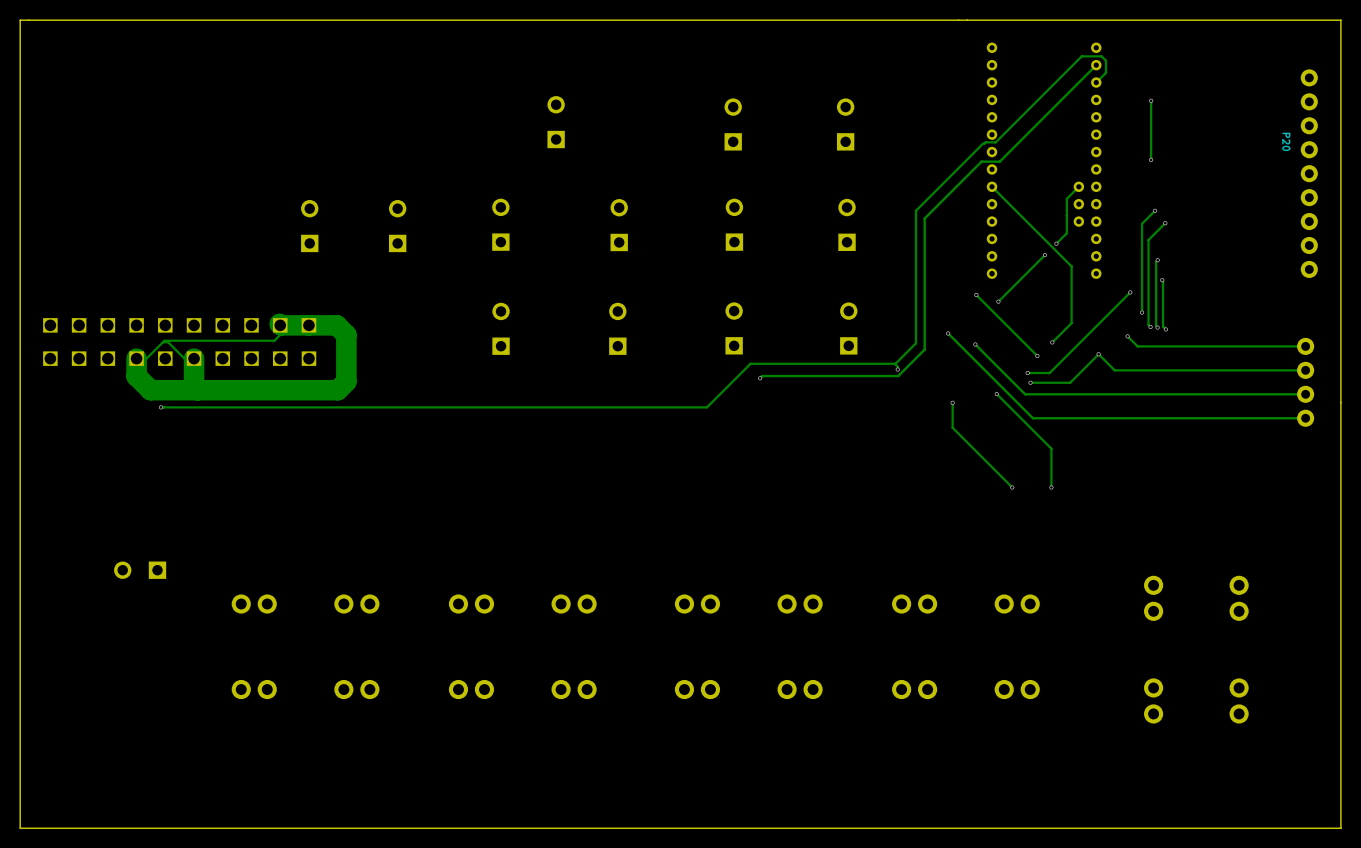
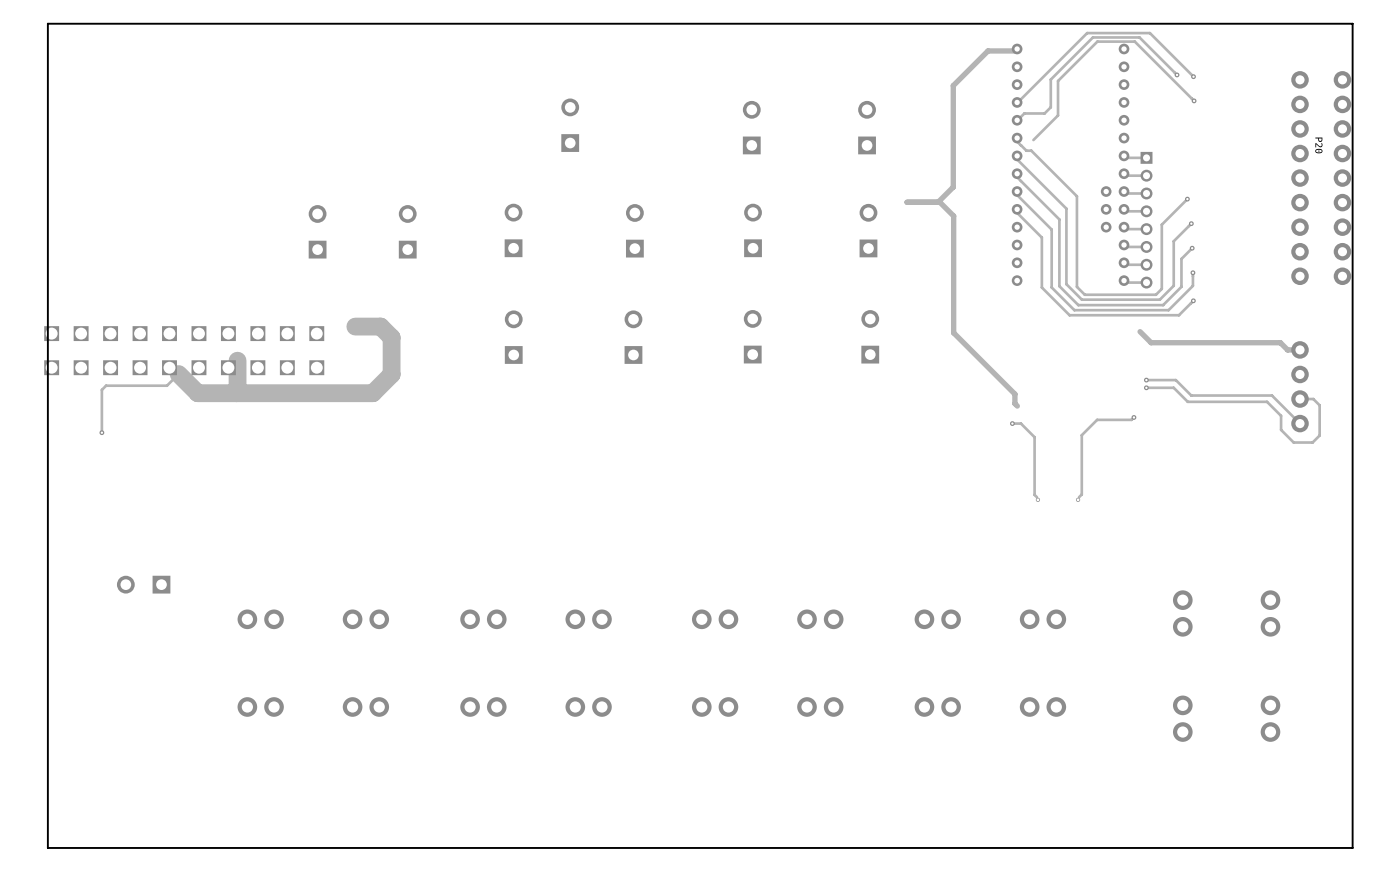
board edge: (1340, 20) (20, 20) (20, 828) (1340, 828) (1340, 20) -> (1352, 23) (1352, 847) (47, 847) (47, 23) (1352, 23)
track: none -> (1015, 50) (987, 50) (953, 85) (953, 187) (938, 202)
track: (1096, 65) (999, 161) (981, 161) (924, 218) (924, 349) -> none
track: none -> (1177, 74) (1139, 37) (1092, 37) (1050, 79) (1050, 107) (1044, 113) (1024, 113) (1015, 122)
via: none -> (1177, 74)
track: none -> (1193, 76) (1149, 33) (1087, 33) (1015, 104) (1015, 101)
via: none -> (1193, 76)
track: (1096, 82) (1105, 72) (1105, 60) (1101, 56) (1081, 56) (995, 142) (982, 143) (916, 210) (916, 343) (895, 363) -> none
track: none -> (1194, 100) (1134, 41) (1097, 41) (1058, 80) (1058, 115) (1033, 140)
via: none -> (1194, 100)
track: (1151, 100) (1151, 159) -> none
via: (1151, 100) -> none
track: none -> (1015, 140) (1026, 150) (1031, 150) (1076, 196) (1076, 286) (1084, 294) (1155, 294) (1161, 288) (1161, 224) (1187, 199)
track: none -> (1015, 157) (1066, 208) (1066, 284) (1081, 299) (1159, 299) (1173, 285) (1173, 241) (1191, 223)
track: none -> (1146, 157) (1122, 157)
via: (1151, 159) -> none
track: none -> (1015, 175) (1059, 219) (1059, 286) (1078, 305) (1163, 305) (1181, 286) (1181, 258) (1192, 248)
track: none -> (1146, 175) (1122, 175)
part: none -> (1300, 178)
track: (992, 186) (1071, 266) (1071, 323) (1052, 342) -> none
track: (1078, 186) (1066, 198) (1066, 233) (1056, 243) -> none
track: none -> (1015, 193) (1051, 229) (1051, 287) (1074, 310) (1168, 310) (1192, 285) (1192, 272)
track: none -> (1146, 193) (1122, 193)
via: none -> (1187, 199)
track: none -> (907, 202) (939, 202) (953, 216) (953, 332) (1014, 394) (1014, 403) (1017, 406)
track: none -> (1015, 211) (1041, 237) (1041, 287) (1069, 315) (1178, 315) (1193, 300)
track: none -> (1146, 211) (1122, 211)
track: (1155, 210) (1142, 223) (1142, 312) -> none
via: (1155, 210) -> none
part: none -> (1146, 220)
via: none -> (1191, 223)
track: none -> (1146, 229) (1122, 229)
track: (1165, 223) (1148, 240) (1148, 324) (1150, 326) -> none
via: (1165, 223) -> none
track: none -> (1146, 246) (1122, 246)
via: none -> (1192, 248)
via: (1056, 243) -> none
track: (1045, 255) (998, 301) -> none
via: (1045, 255) -> none
track: none -> (1146, 264) (1122, 264)
track: (1157, 260) (1156, 261) (1157, 327) -> none
via: (1157, 260) -> none
via: none -> (1192, 272)
track: none -> (1146, 282) (1122, 282)
track: (1162, 280) (1163, 326) (1165, 329) -> none
via: (1162, 280) -> none
track: (1130, 292) (1049, 373) (1027, 373) -> none
via: (1130, 292) -> none
via: none -> (1193, 300)
track: (976, 294) (1037, 355) -> none
via: (976, 294) -> none
via: (998, 301) -> none
via: (1142, 312) -> none
track: none -> (355, 326) (380, 326) (391, 337) (391, 374) (372, 393) (197, 393) (178, 374) (166, 385) (106, 385) (101, 389) (101, 432)
track: (279, 323) (336, 325) (346, 334) (346, 381) (337, 390) (150, 390) (136, 376) (136, 358) (146, 358) (164, 340) (274, 340) (280, 334) (280, 325) -> none
track: none -> (1140, 331) (1151, 342) (1280, 342) (1287, 349) (1300, 349)
via: (1150, 326) -> none
via: (1157, 327) -> none
via: (1165, 329) -> none
track: (948, 333) (1032, 418) (1305, 418) -> none
via: (948, 333) -> none
track: (1127, 336) (1137, 346) (1305, 346) -> none
via: (1127, 336) -> none
track: (163, 342) (168, 342) (184, 358) (194, 358) (194, 386) (197, 390) -> none
via: (1052, 342) -> none
track: (975, 344) (1025, 394) (1305, 394) -> none
via: (975, 344) -> none
track: (924, 349) (898, 376) (762, 376) (760, 378) -> none
track: none -> (237, 360) (236, 393)
via: (1098, 354) -> none
via: (1037, 355) -> none
track: (895, 363) (750, 363) (706, 407) (161, 407) -> none
track: (895, 363) (897, 369) -> none
via: (897, 369) -> none
track: none -> (1146, 380) (1175, 380) (1191, 395) (1271, 395) (1300, 423)
via: none -> (1146, 380)
track: (1305, 370) (1114, 370) (1098, 354) (1070, 382) (1030, 382) -> none
via: (1027, 373) -> none
via: (760, 378) -> none
track: none -> (1146, 387) (1173, 387) (1187, 401) (1267, 401) (1281, 415) (1281, 429) (1293, 442) (1312, 442) (1319, 435) (1319, 405) (1313, 399) (1300, 399)
via: none -> (1146, 387)
via: (1030, 382) -> none
part position: (1305, 382) -> (1300, 386)
track: (996, 394) (1051, 448) (1051, 487) -> none
via: (996, 394) -> none
track: (952, 402) (952, 427) (1012, 487) -> none
via: (952, 402) -> none
via: (161, 407) -> none
track: none -> (1133, 417) (1131, 419) (1097, 419) (1081, 435) (1081, 494) (1079, 497)
via: none -> (1133, 417)
track: none -> (1012, 423) (1020, 423) (1034, 437) (1034, 494) (1036, 497)
via: none -> (1012, 423)
via: none -> (101, 432)

